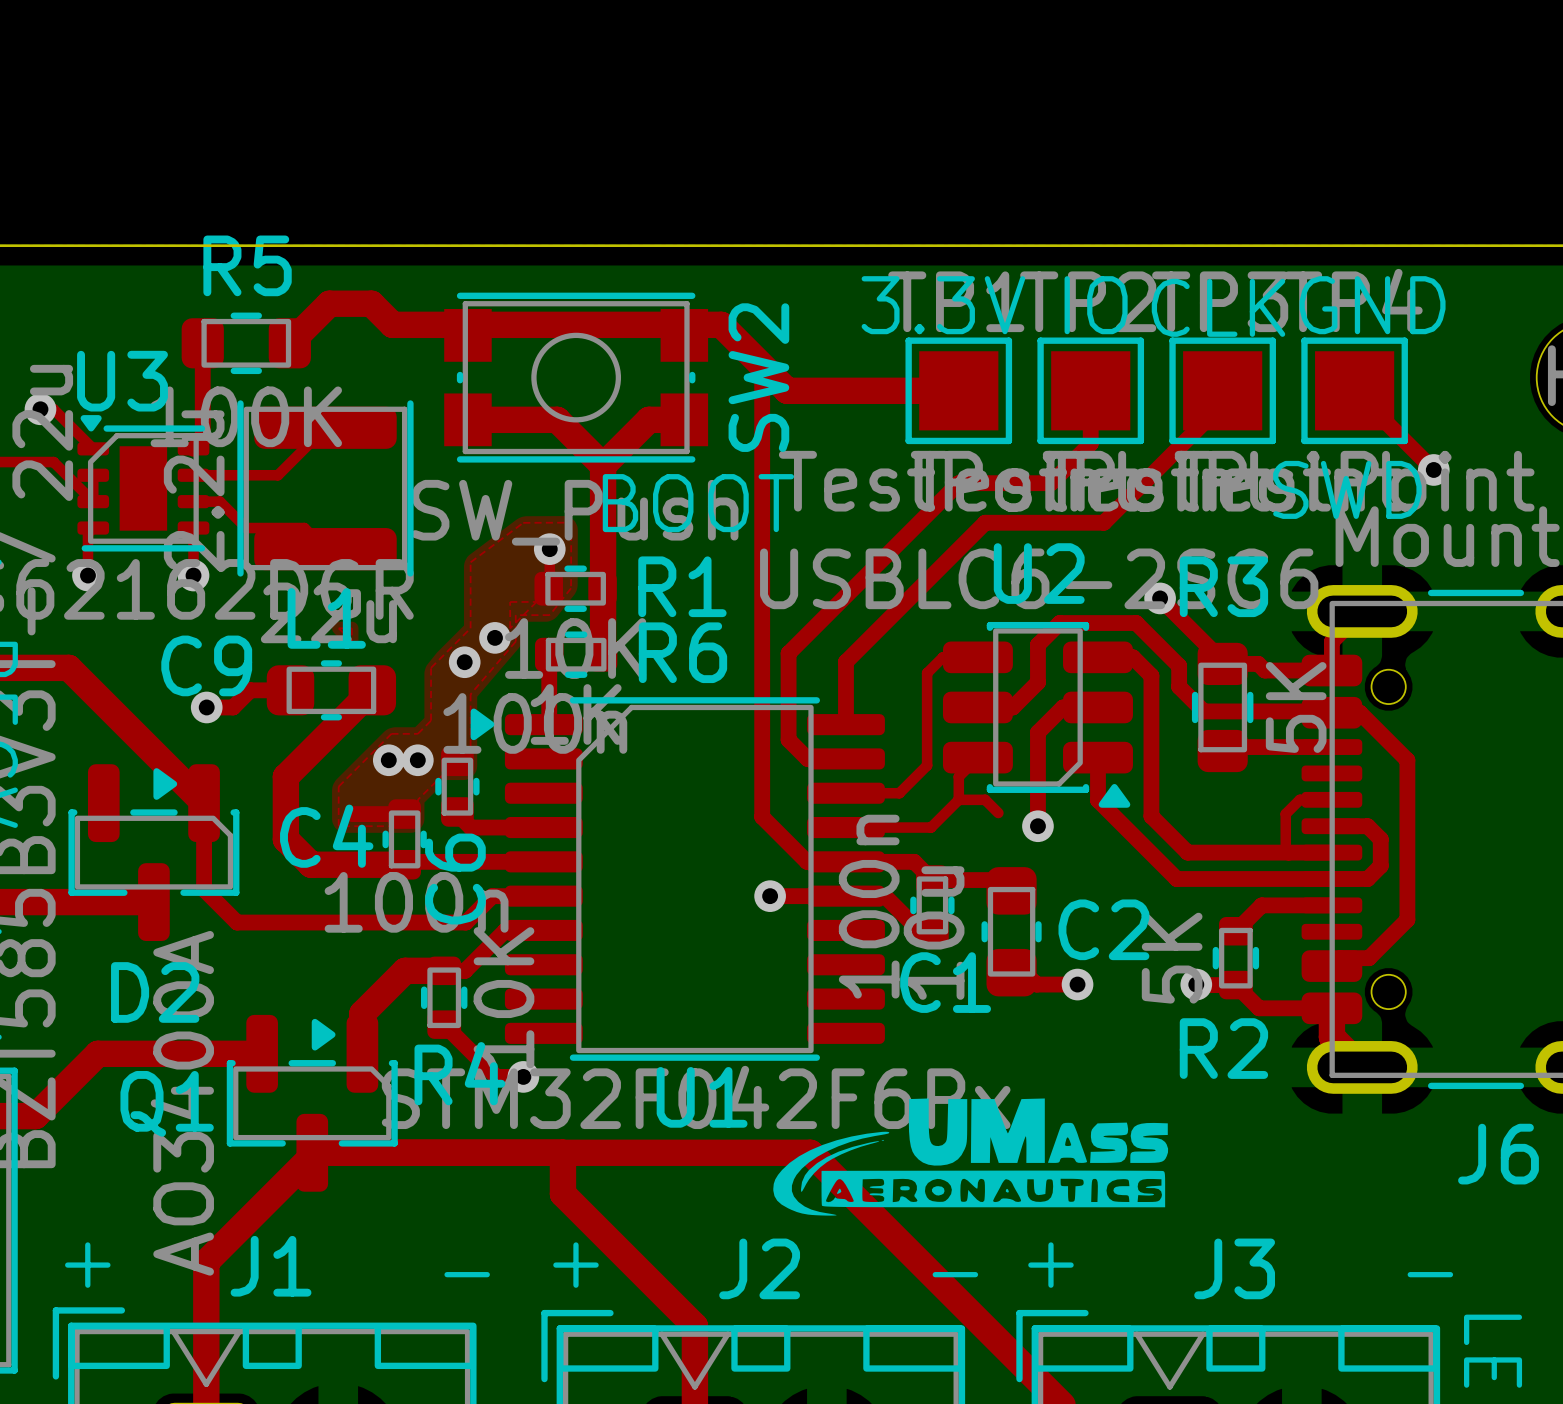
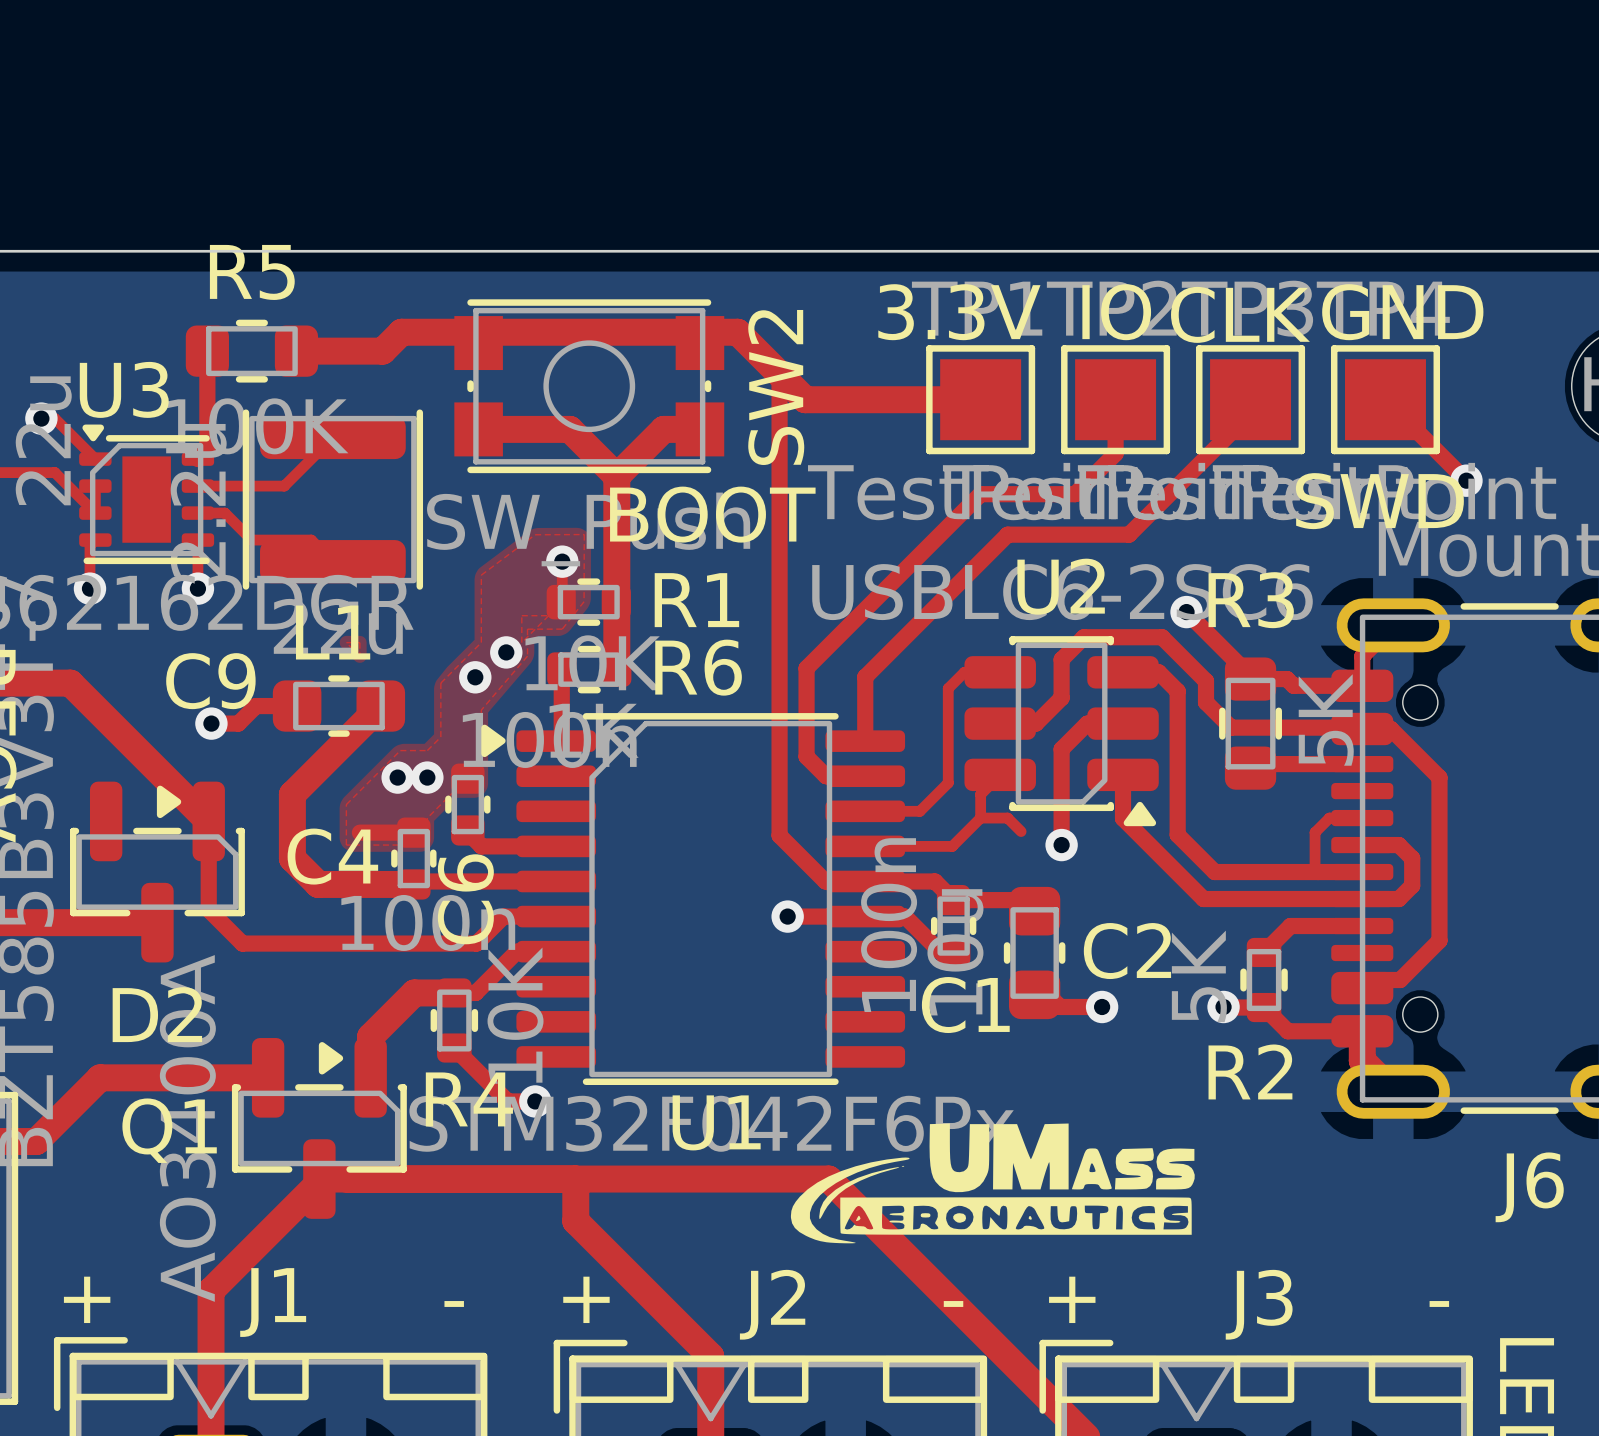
top track: (392, 324) (371, 303) (329, 303) (289, 343) -> (401, 332) (382, 351) (296, 351)

